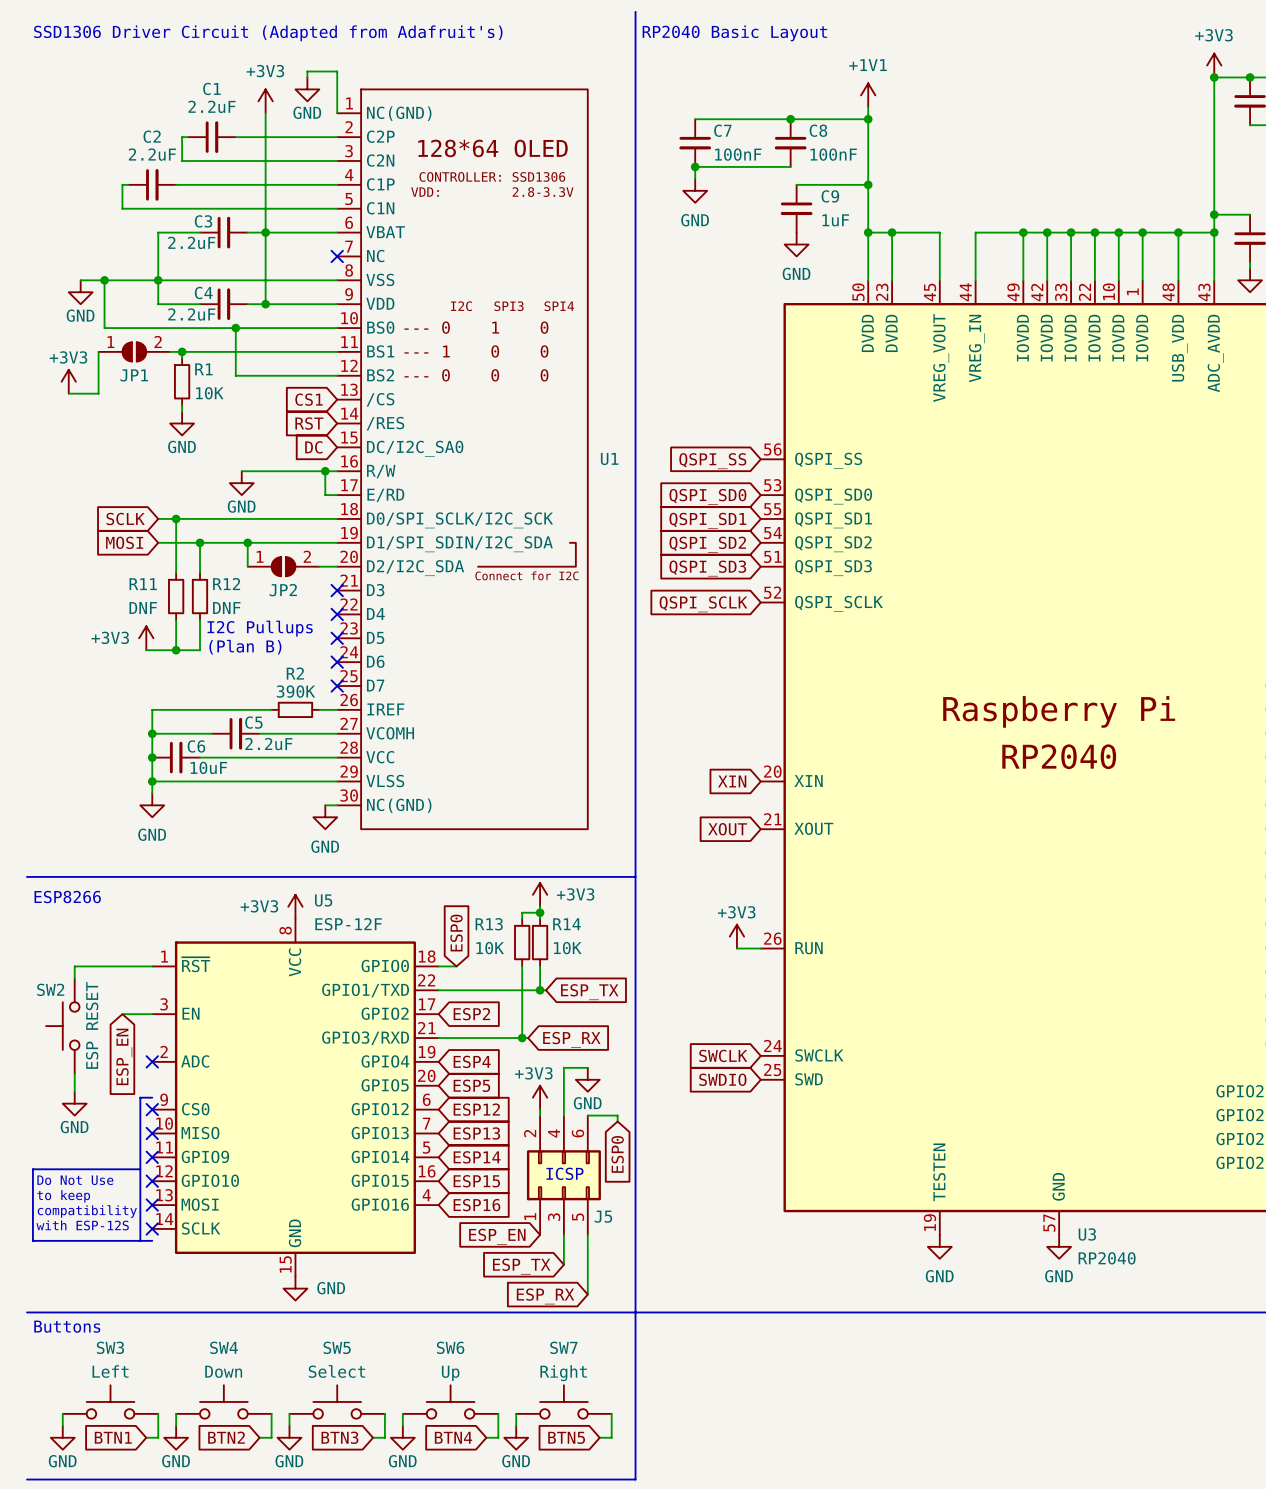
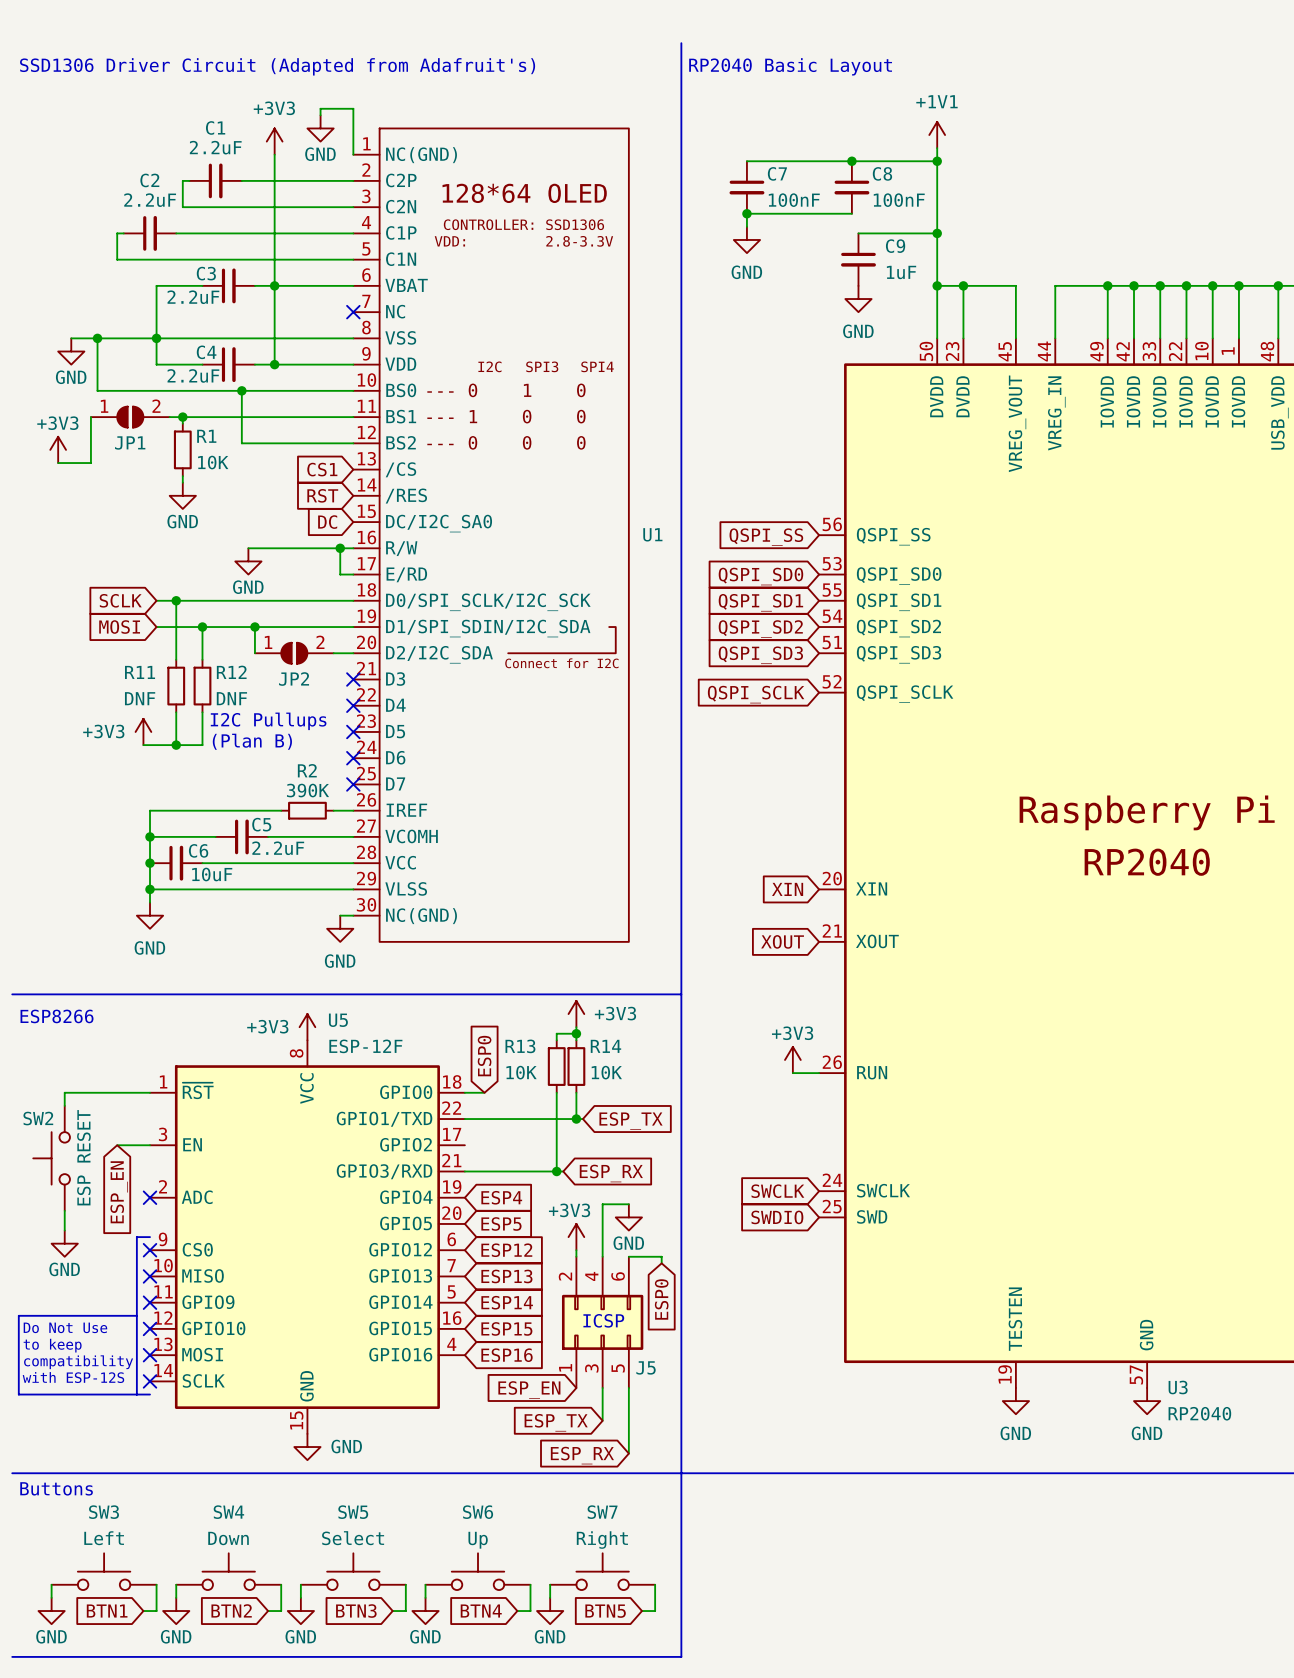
global label: ESP2 (471, 1014) -> none

